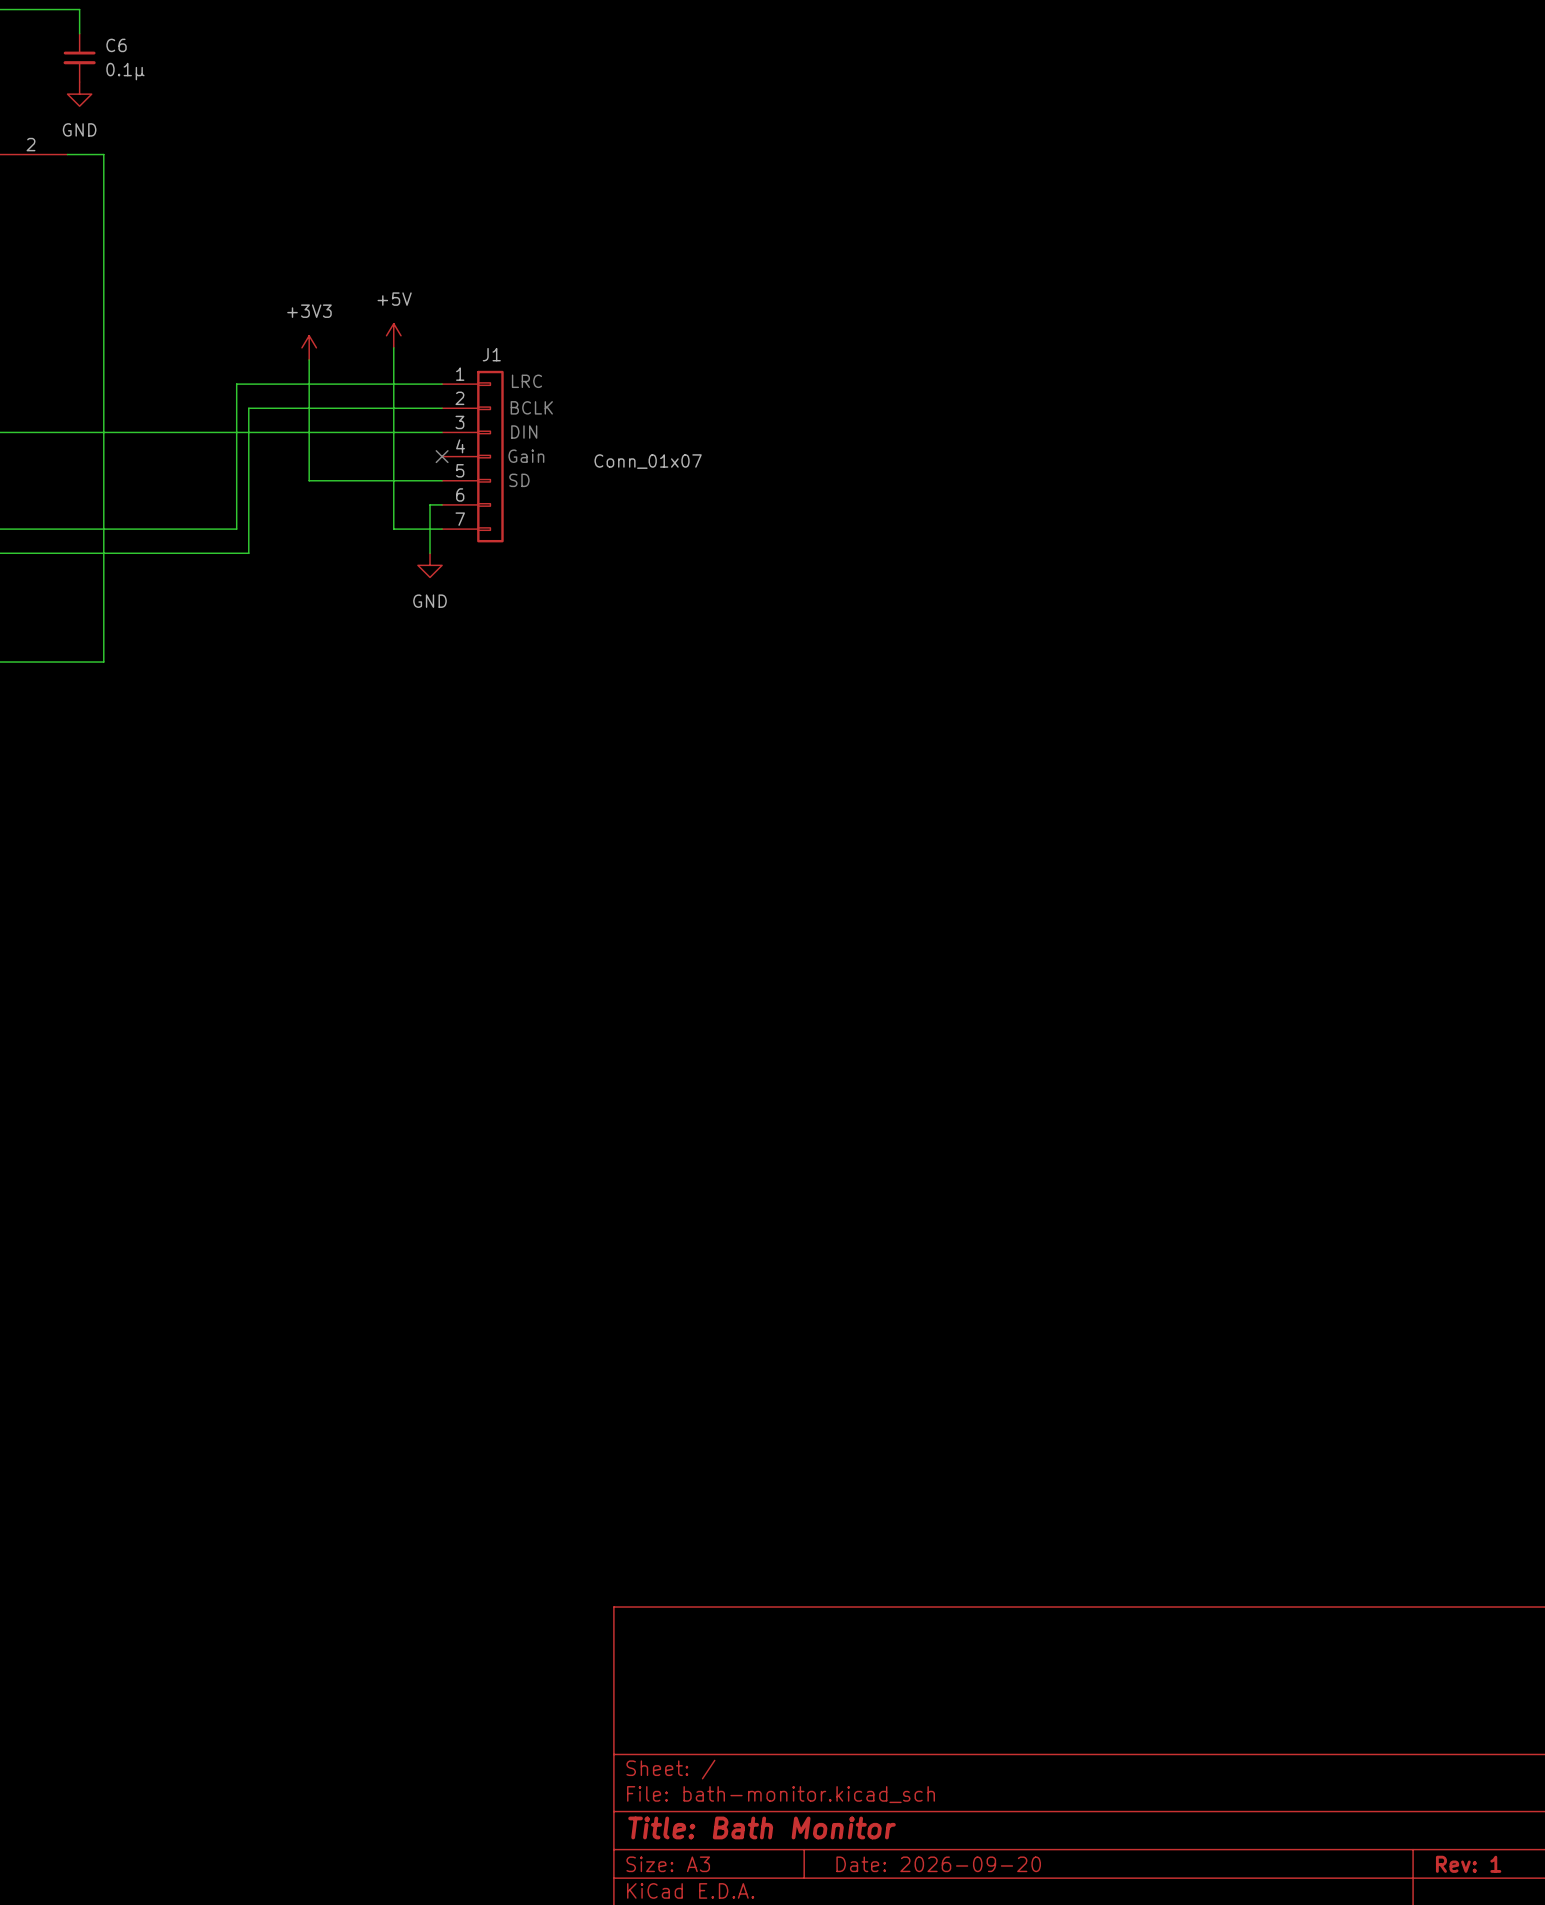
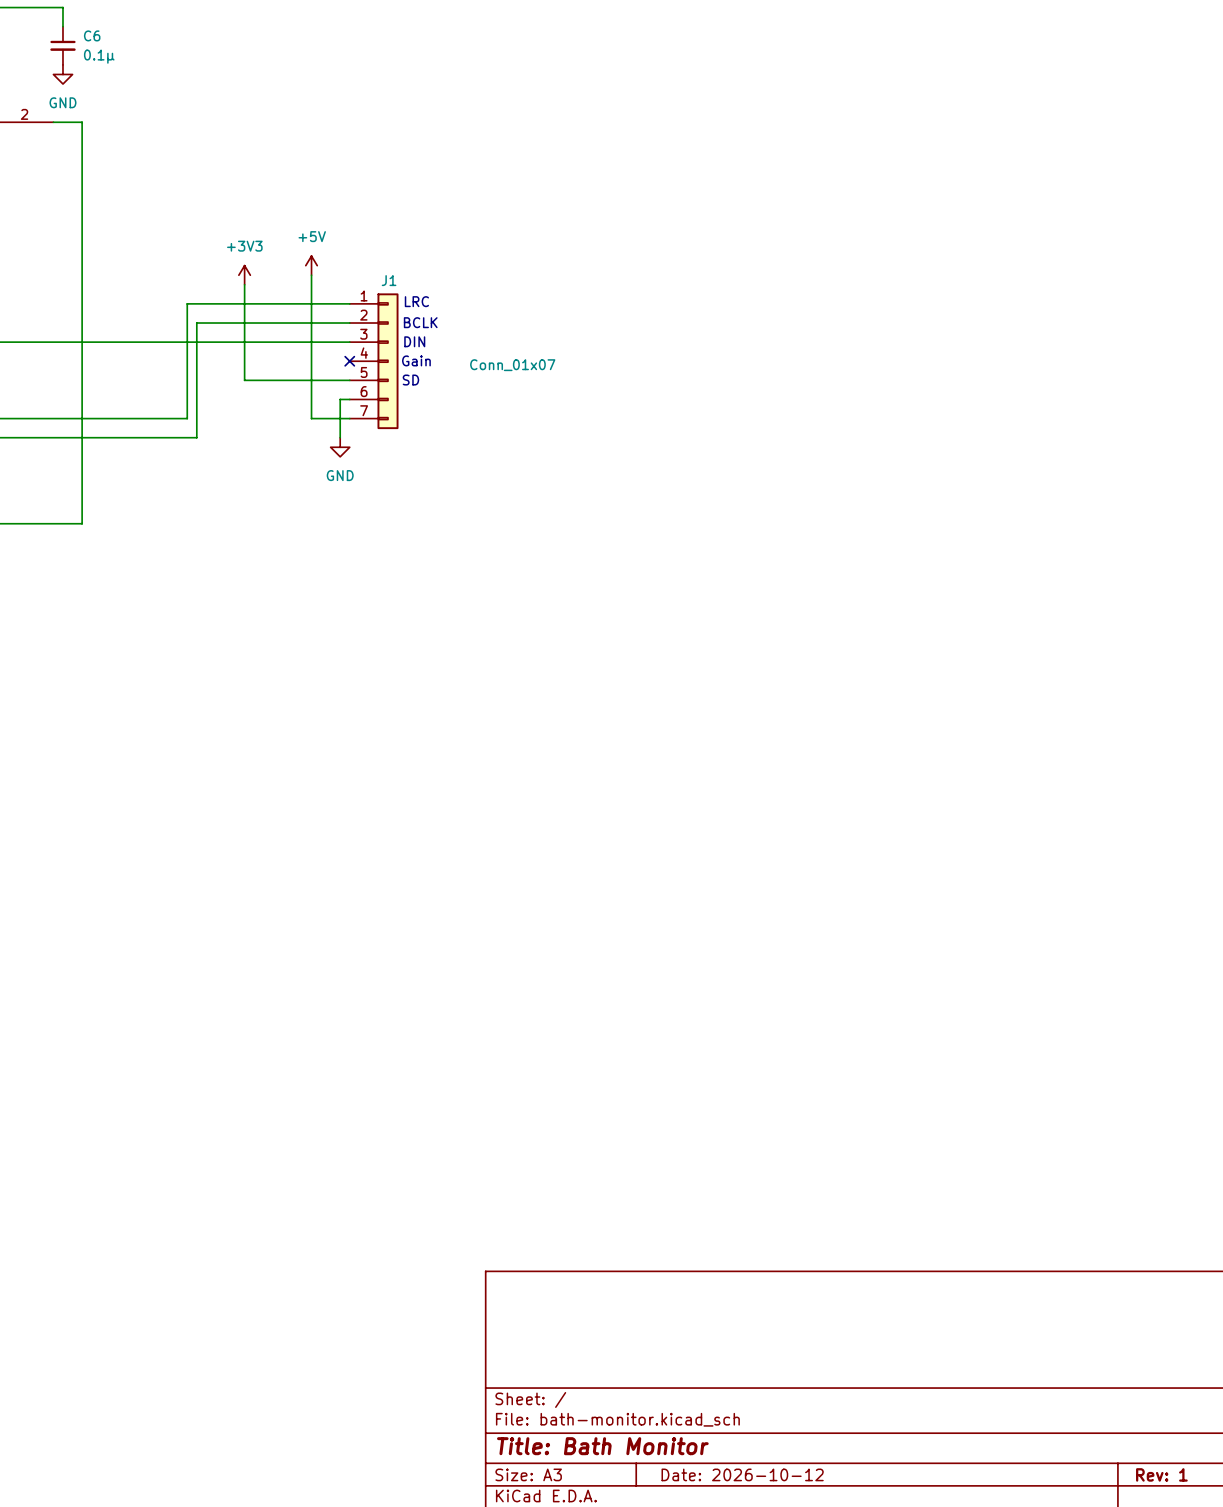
title block: Date: 2026-09-20 (938, 1864) -> Date: 2026-10-12 (742, 1474)

